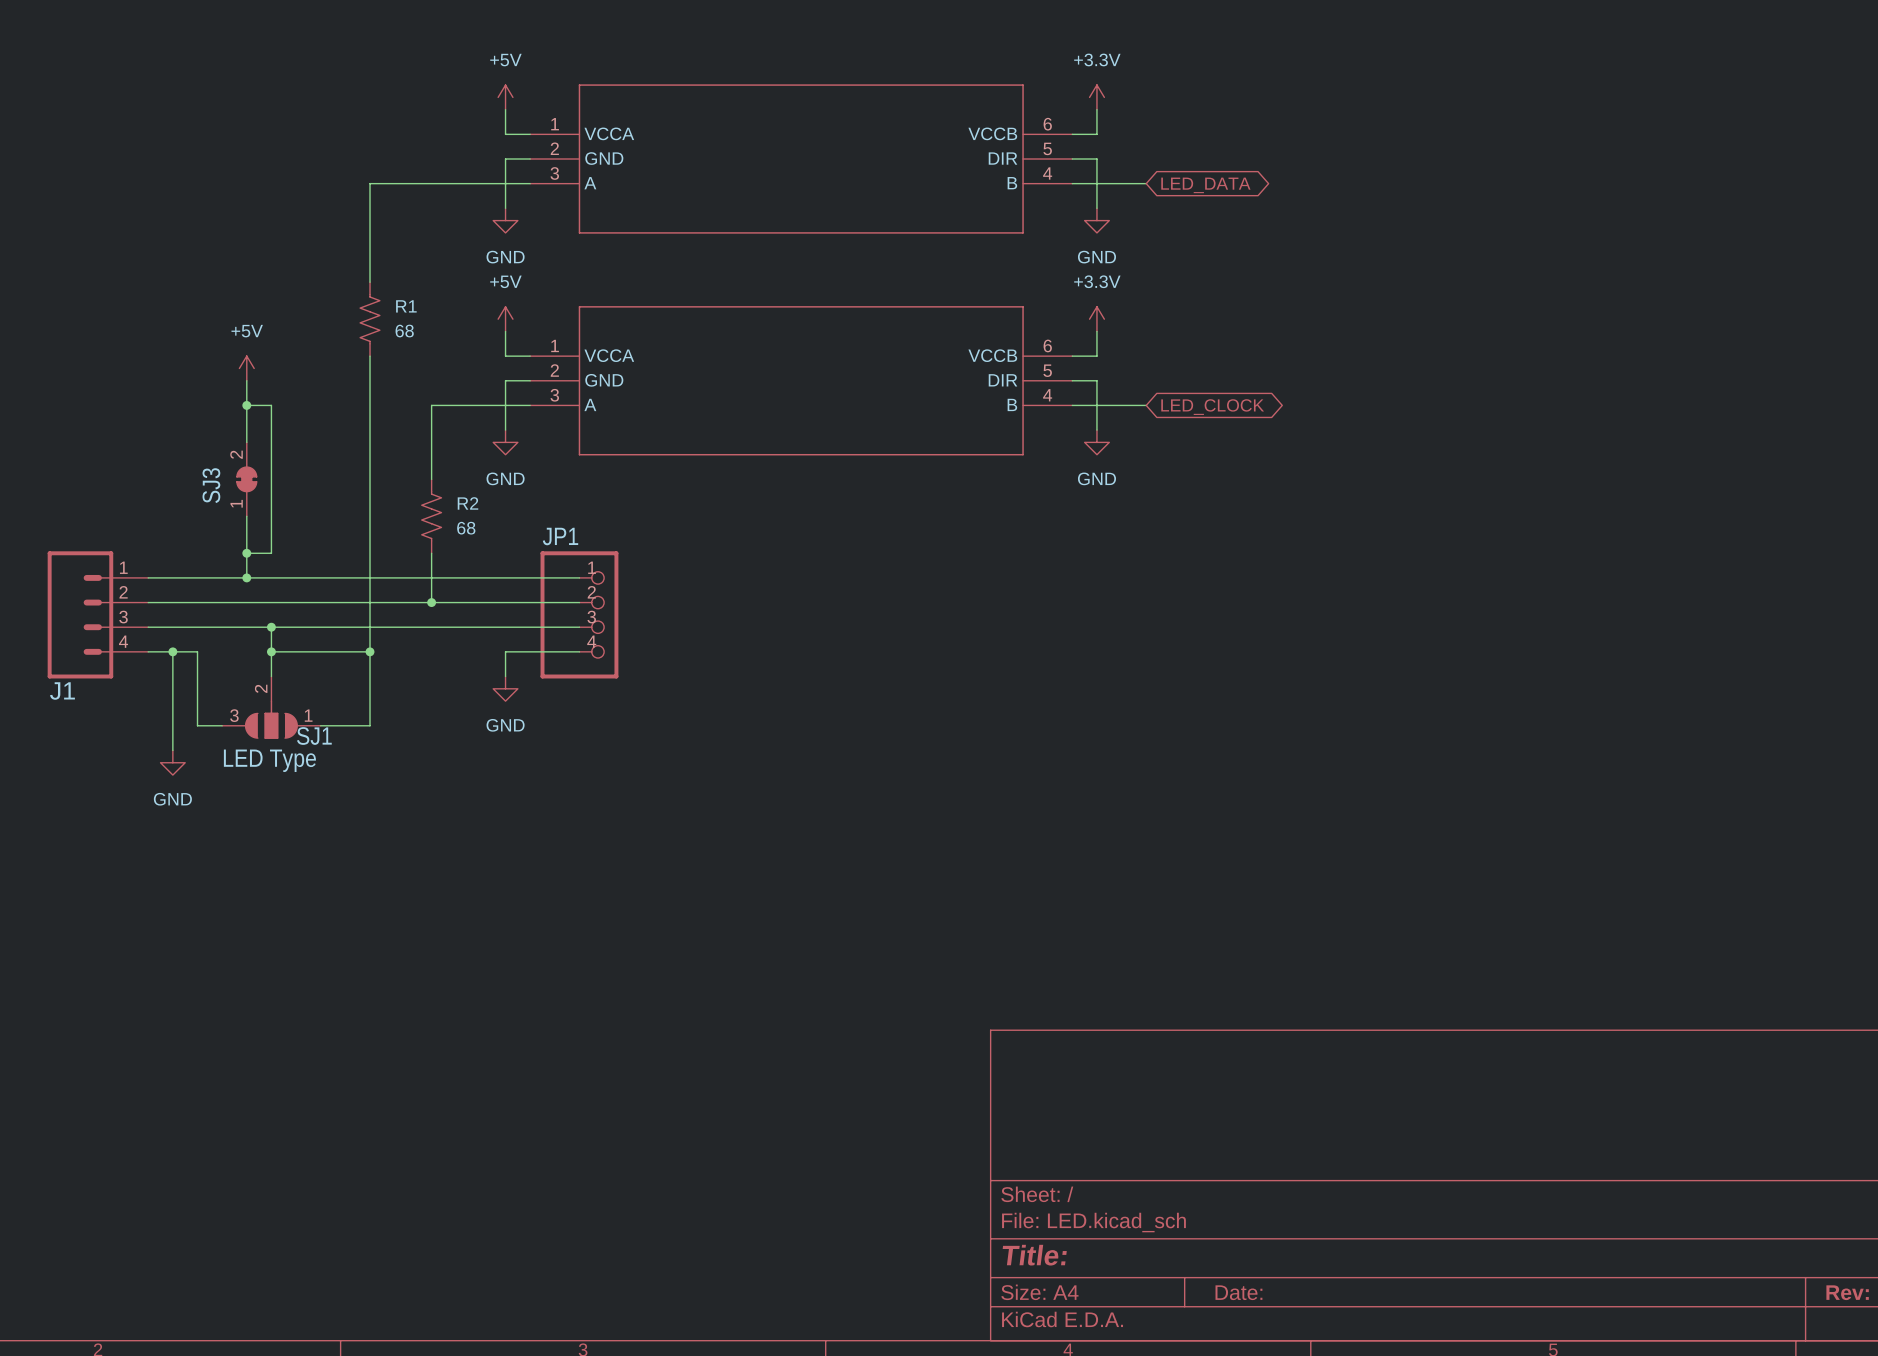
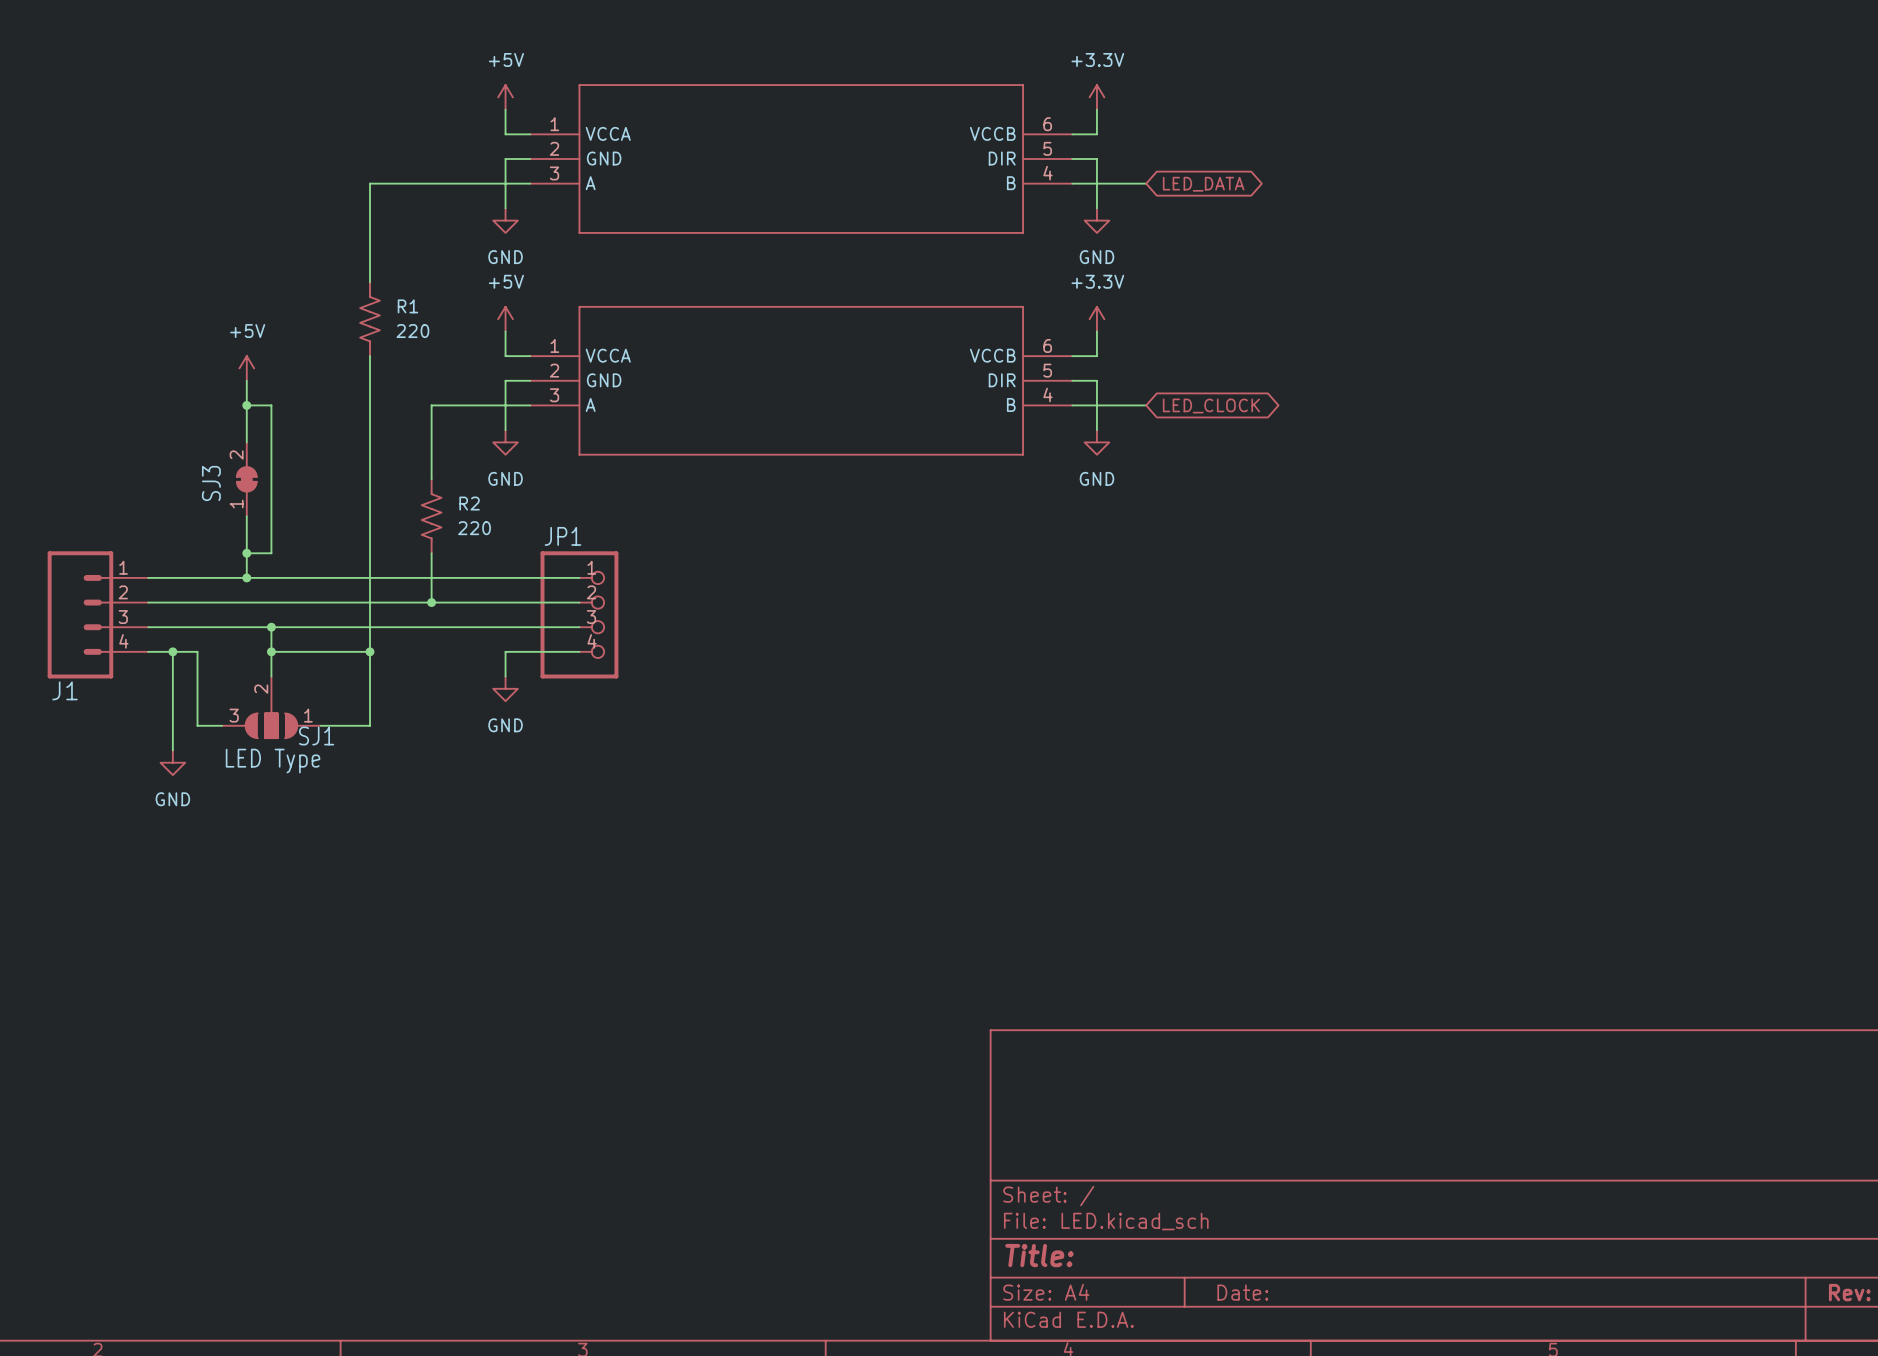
R1 value: 68 (404, 331) -> 220 (412, 331)
R2 value: 68 (466, 528) -> 220 (474, 528)

